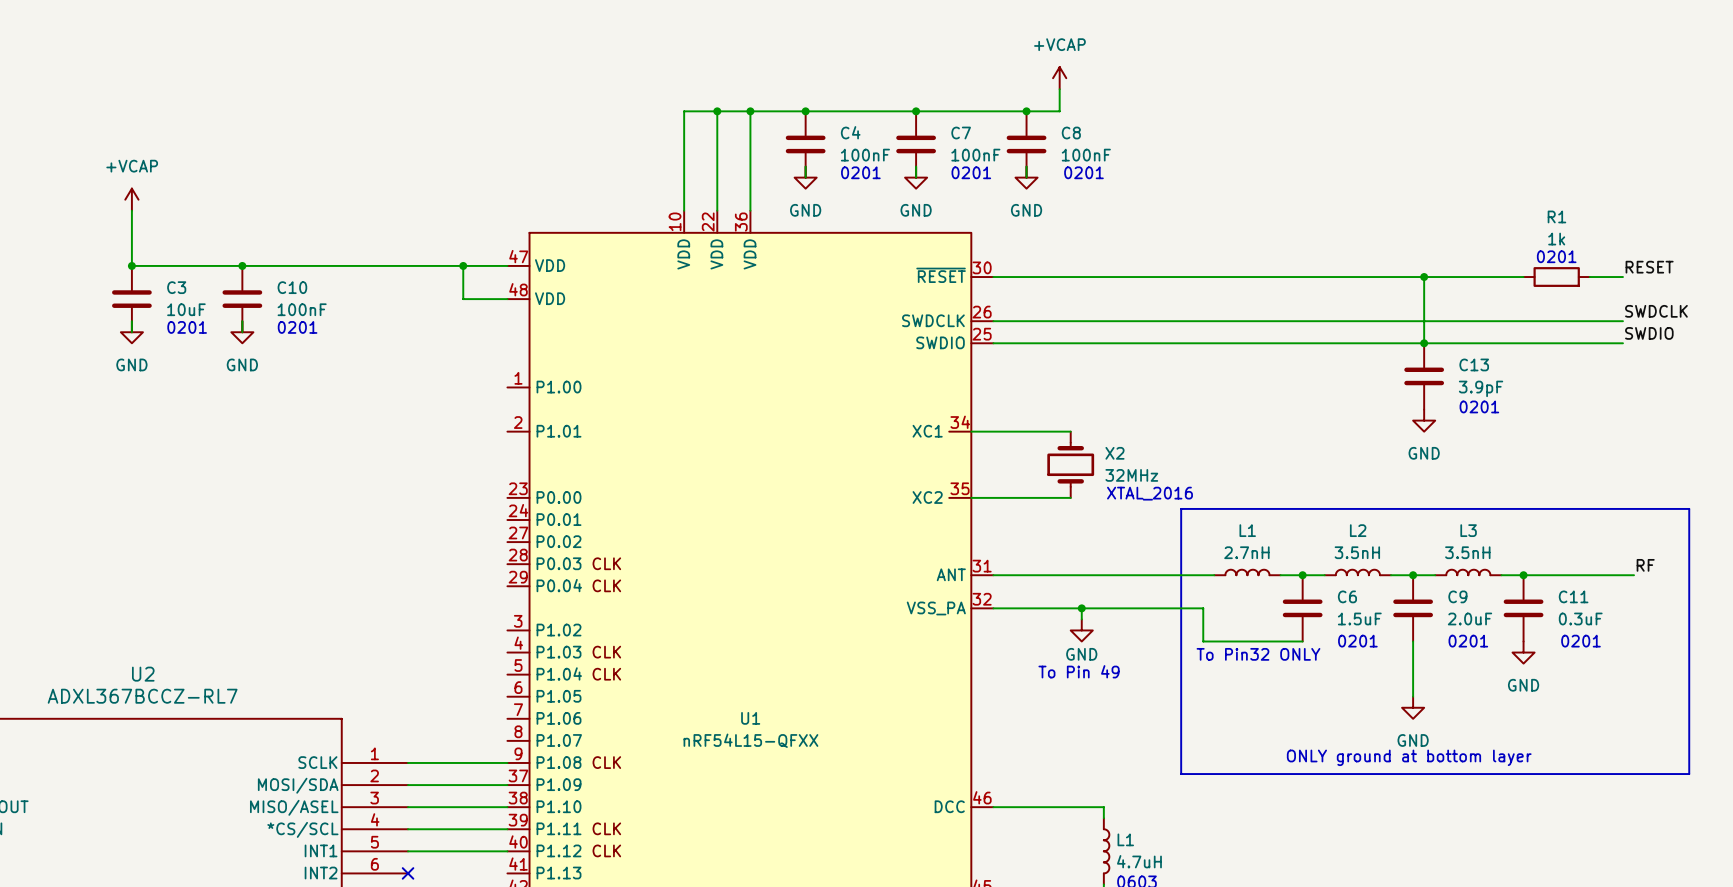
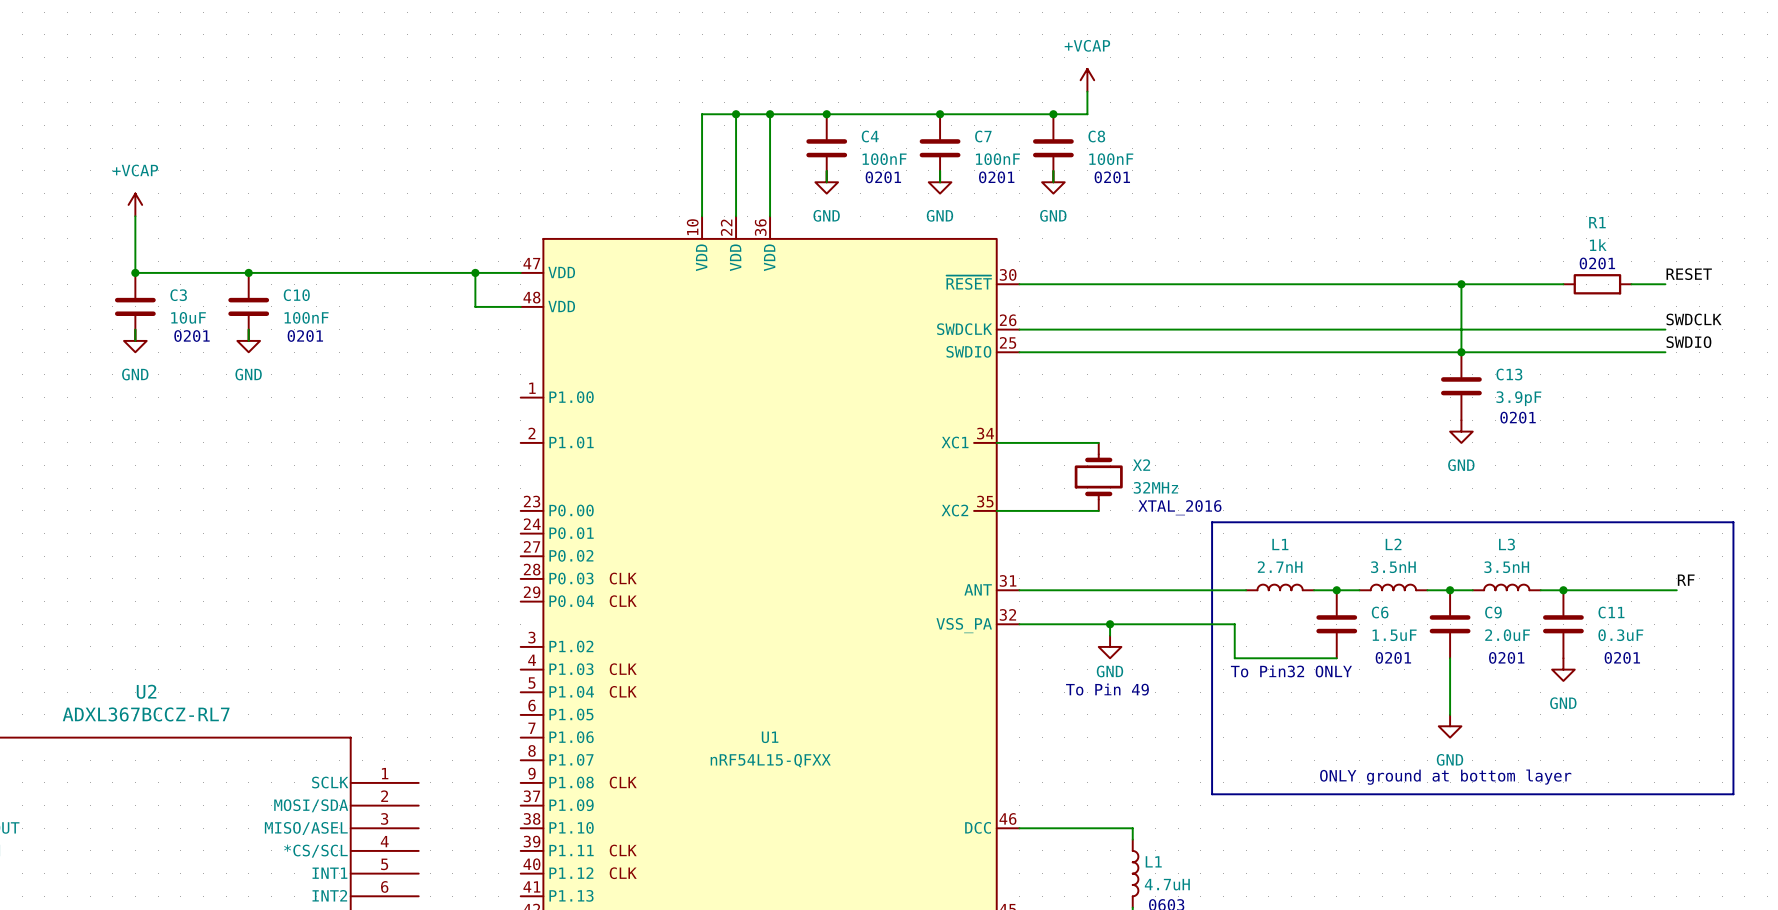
wire: (408, 762) (507, 762) -> none
wire: (408, 785) (507, 785) -> none
wire: (408, 807) (507, 807) -> none
wire: (408, 829) (507, 829) -> none
wire: (408, 851) (507, 851) -> none
no-connect mark: (408, 873) -> none

